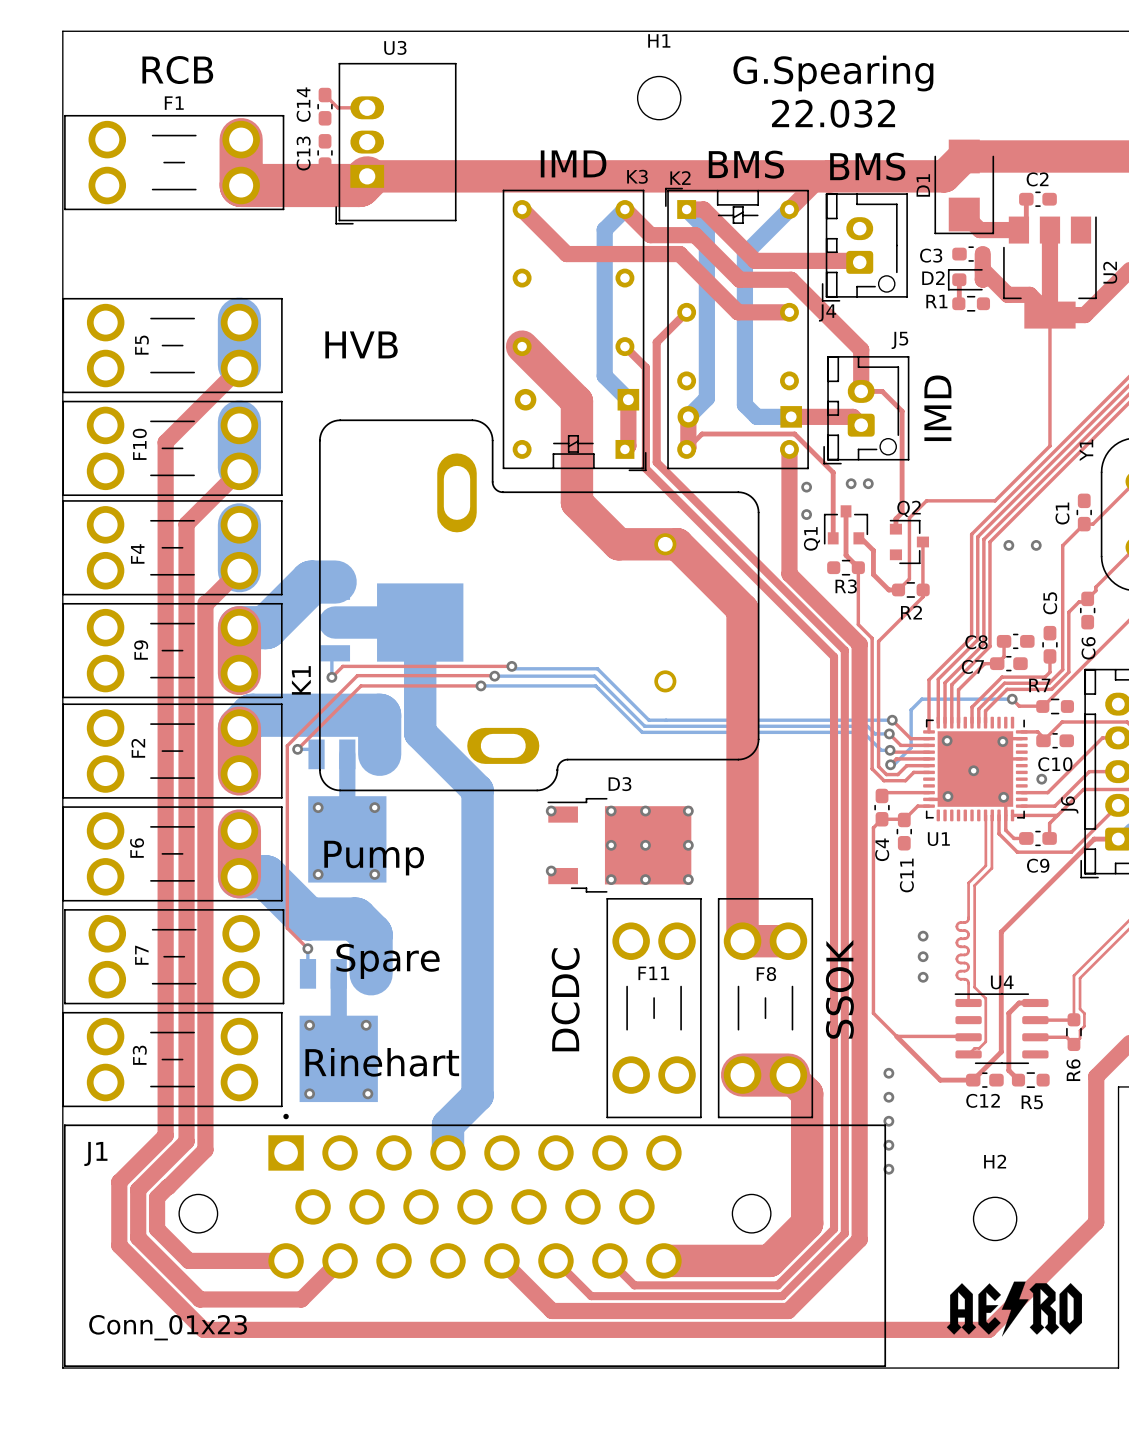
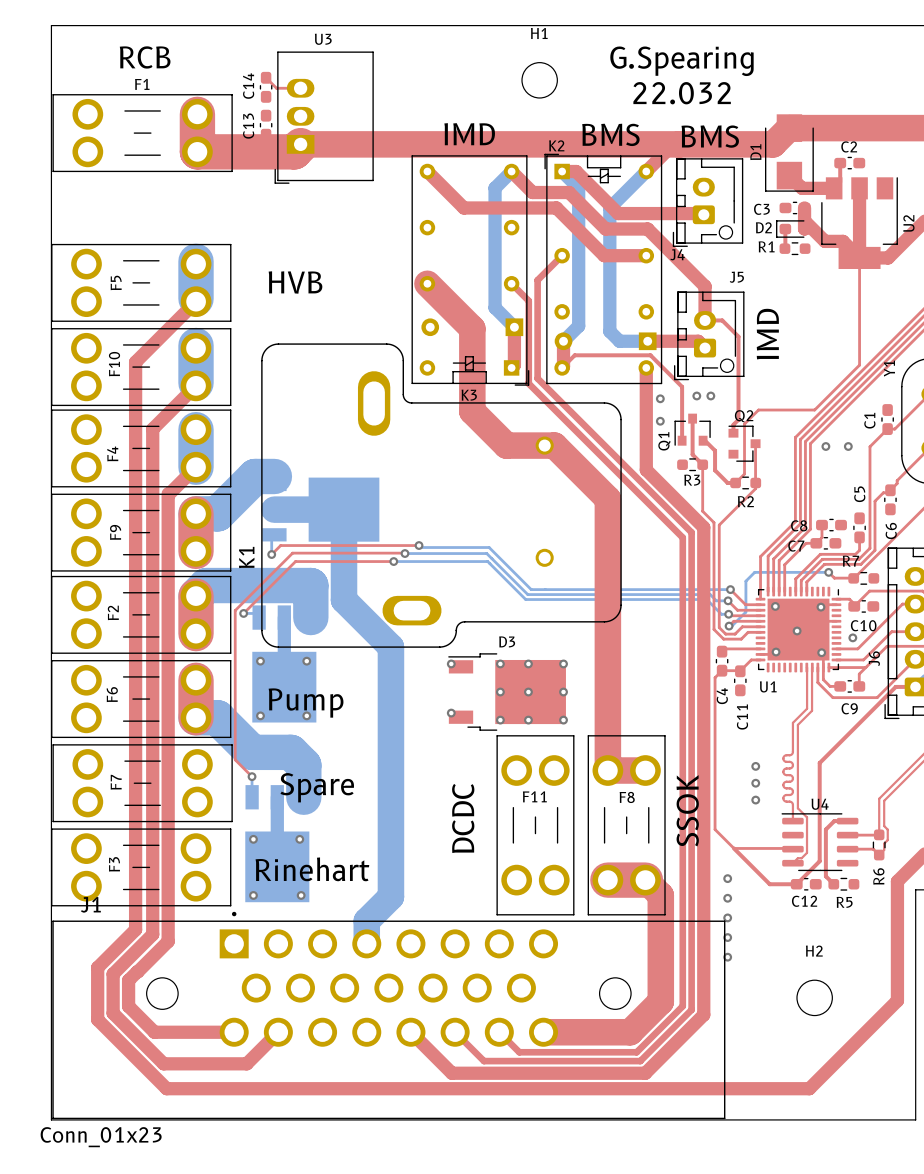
K3 name position: K3 (637, 176) -> K3 (469, 395)
J1 name position: J1 (95, 1153) -> J1 (90, 904)
drawing: [946, 1281, 1083, 1337] -> none
J1 value position: Conn_01x23 (168, 1327) -> Conn_01x23 (101, 1137)

